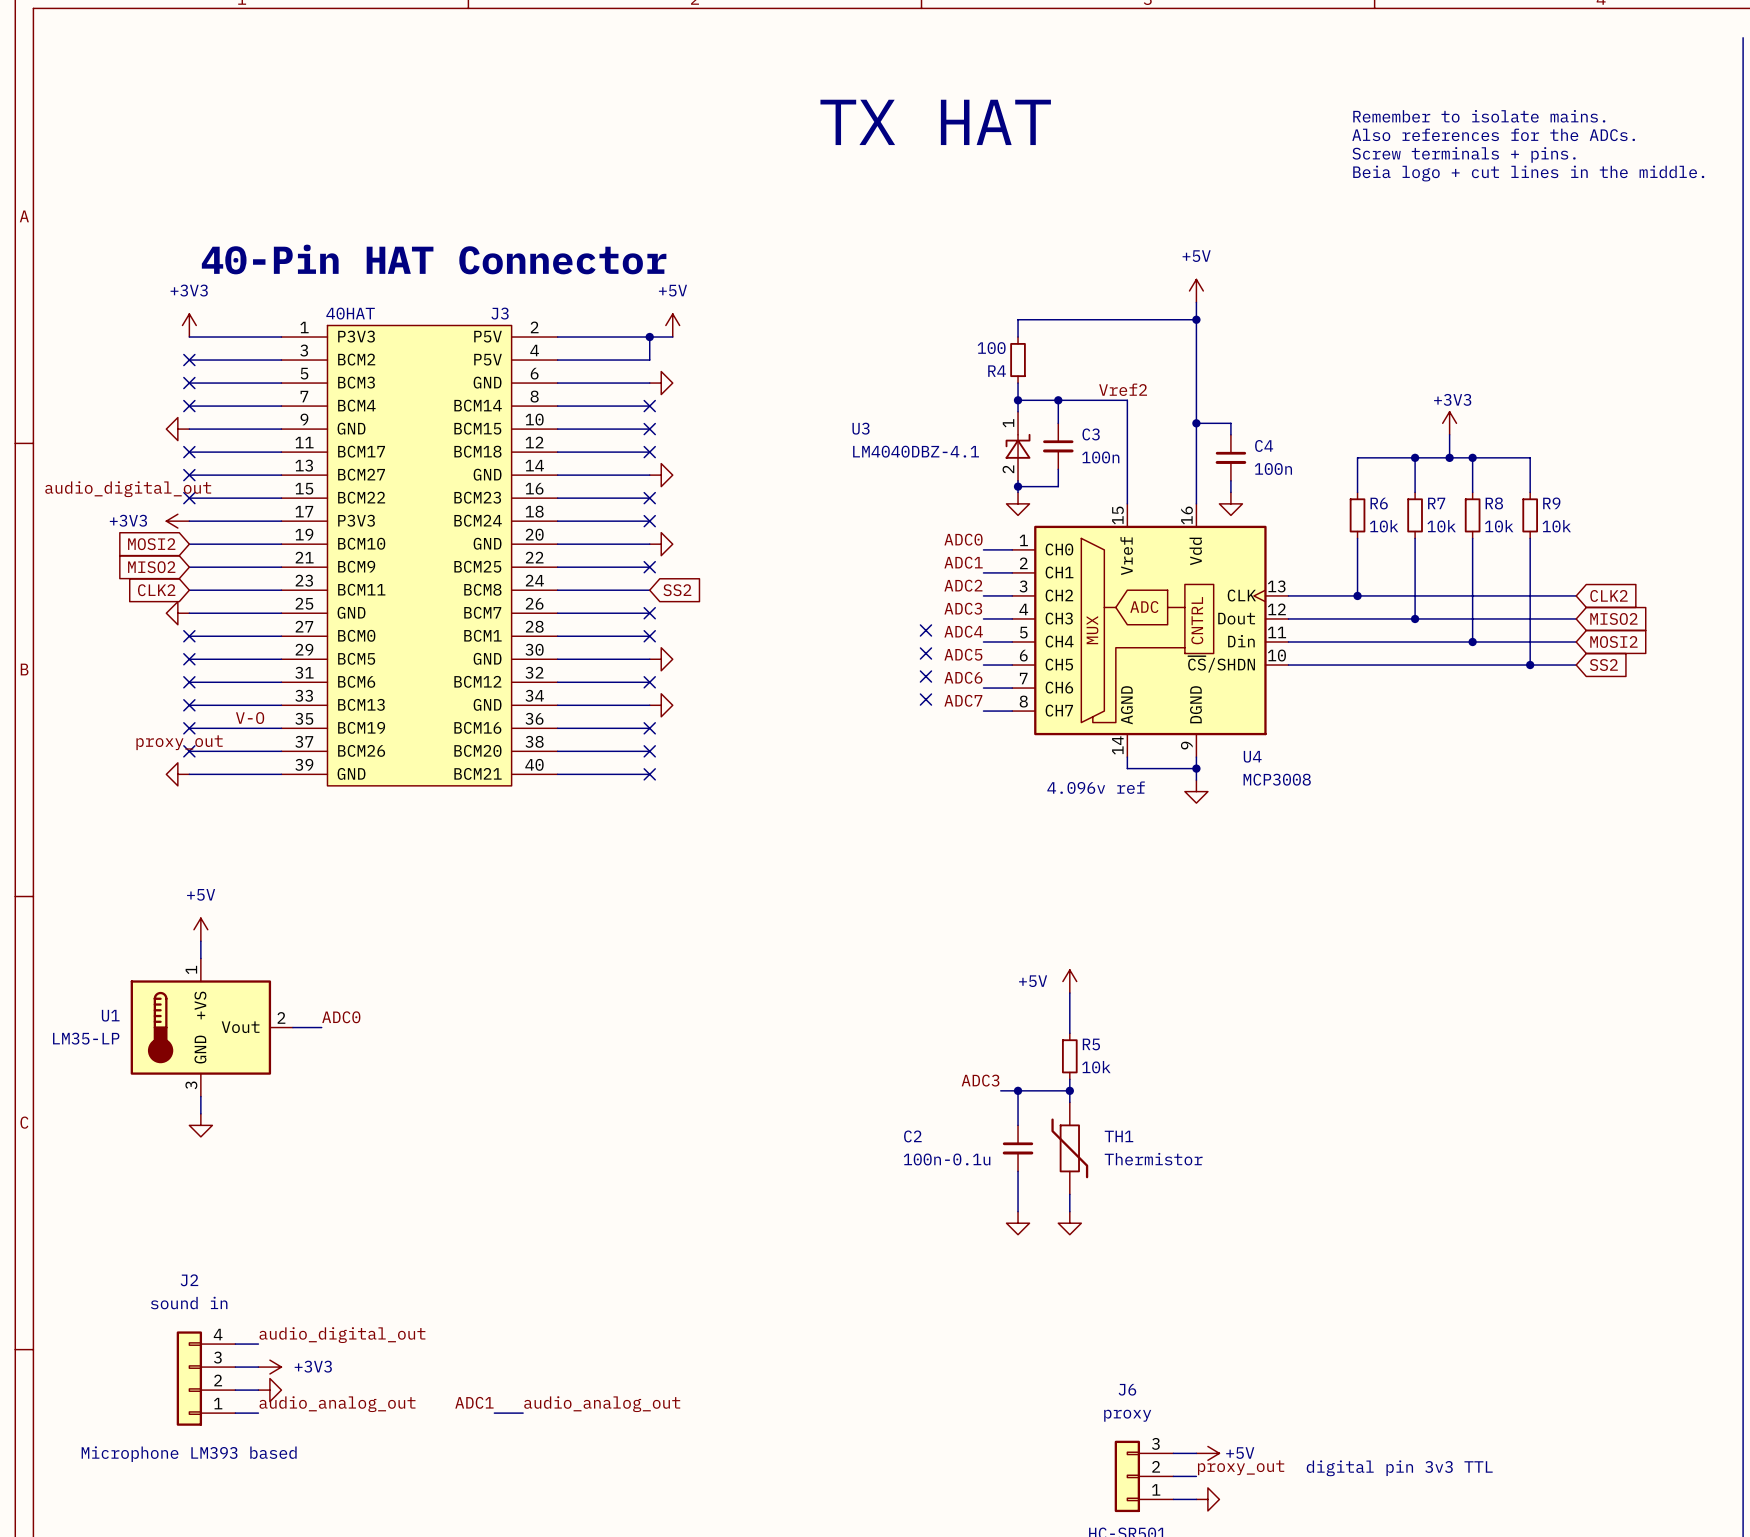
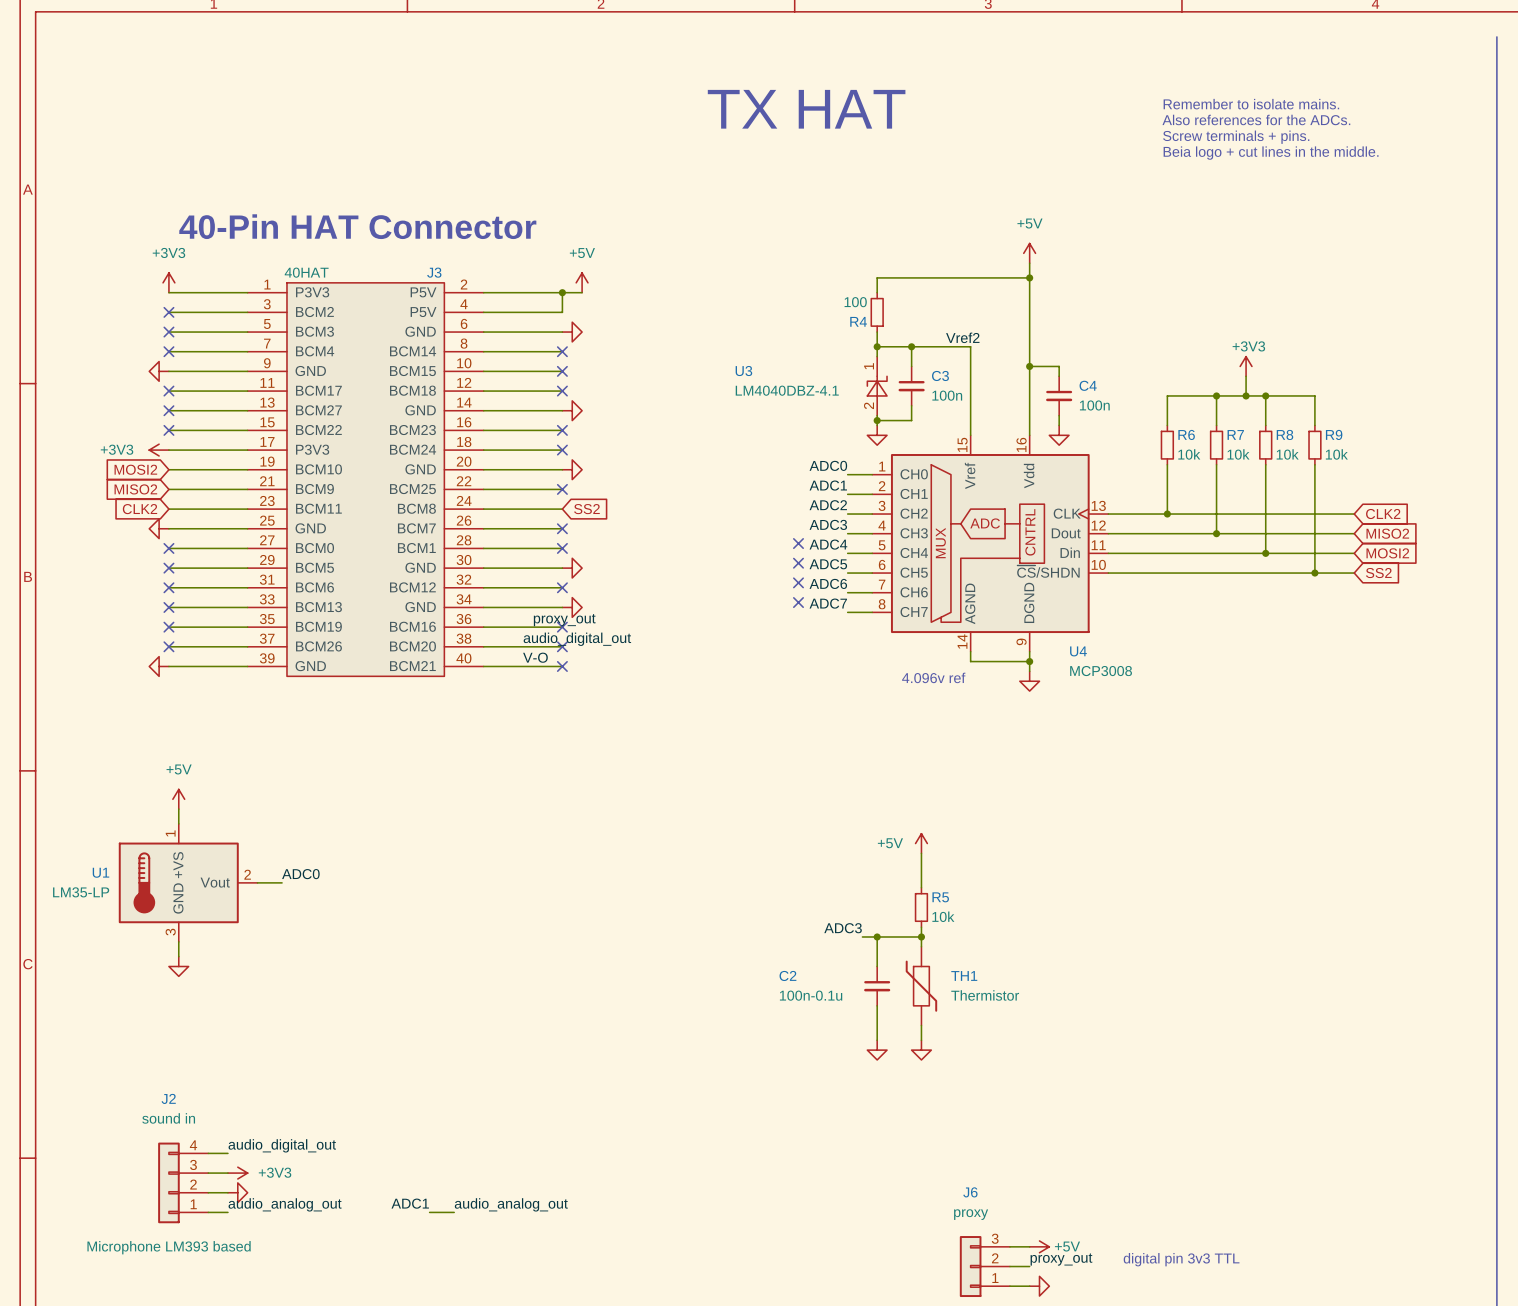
label: audio_digital_out (128, 489) -> none
label: V-O (250, 718) -> none
label: none -> proxy_out (564, 620)
label: proxy_out (179, 742) -> none
label: none -> audio_digital_out (577, 639)
label: none -> V-O (535, 657)

